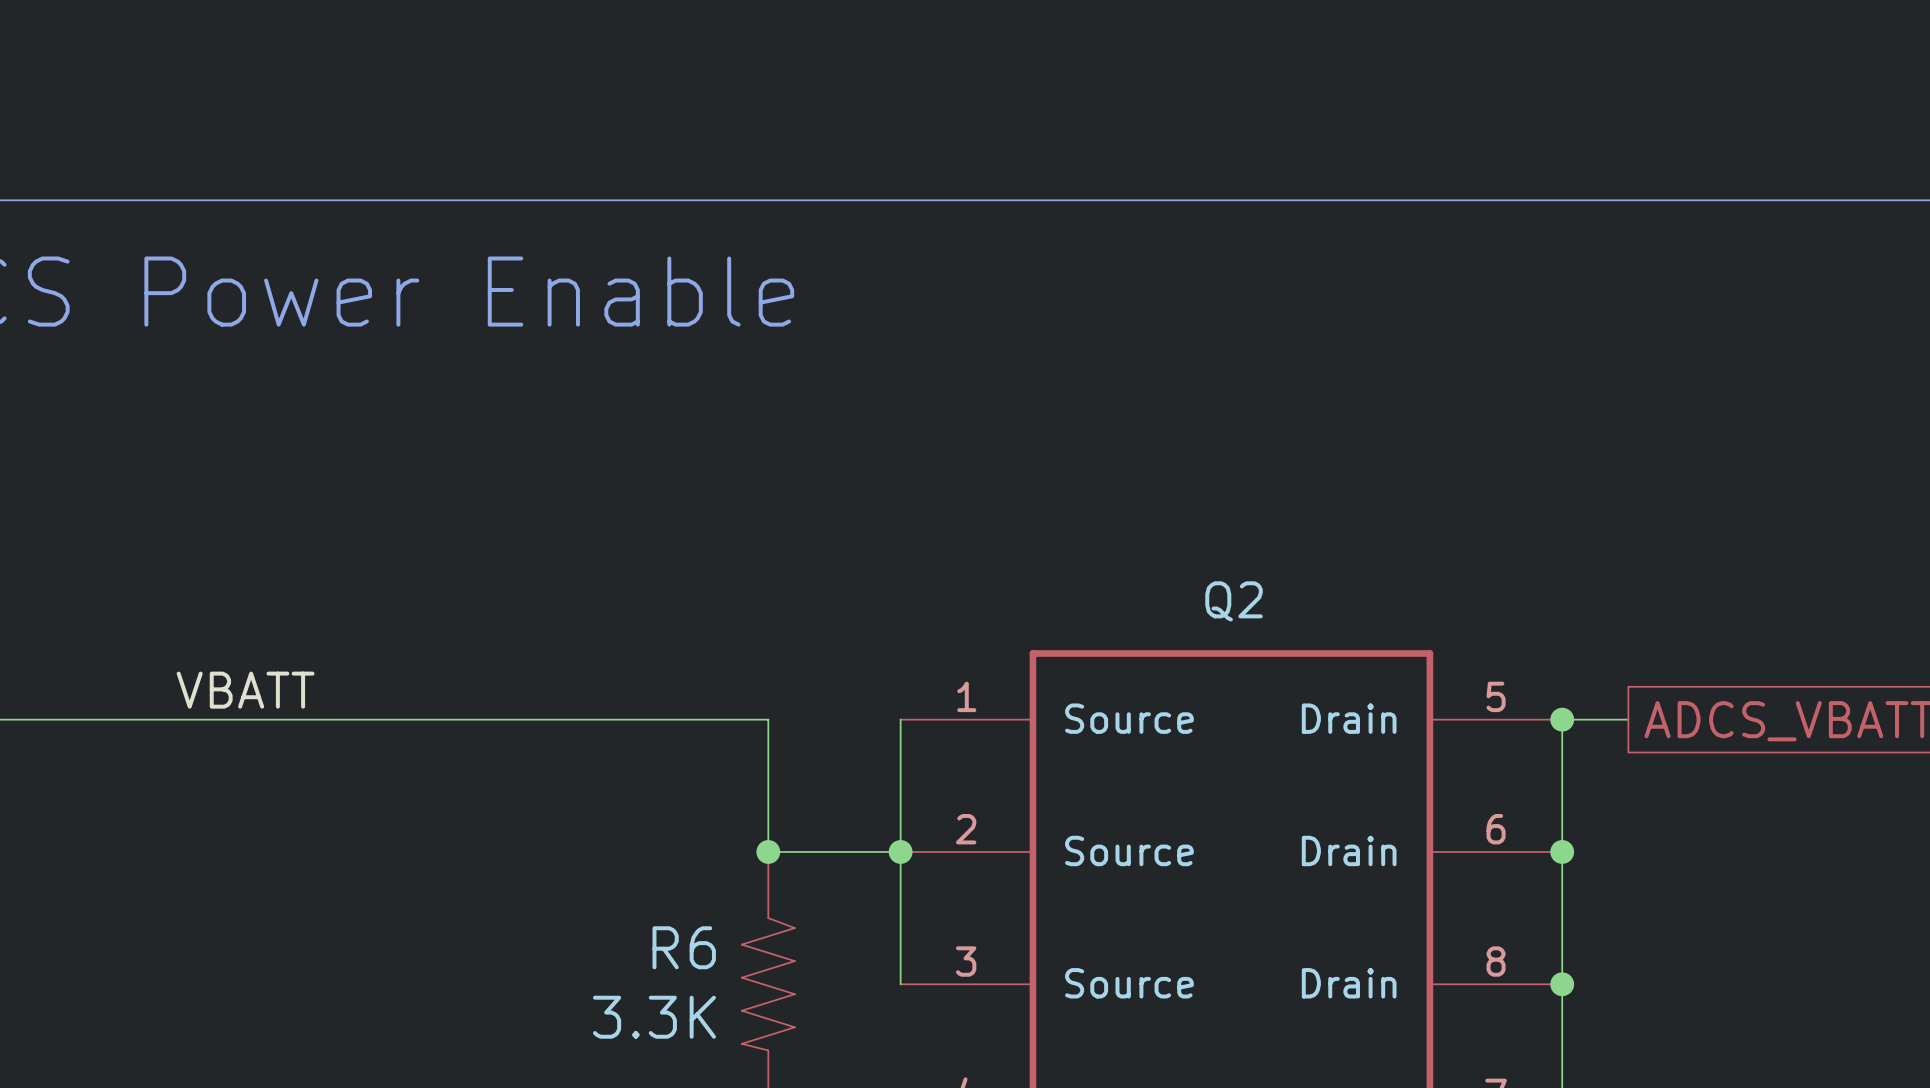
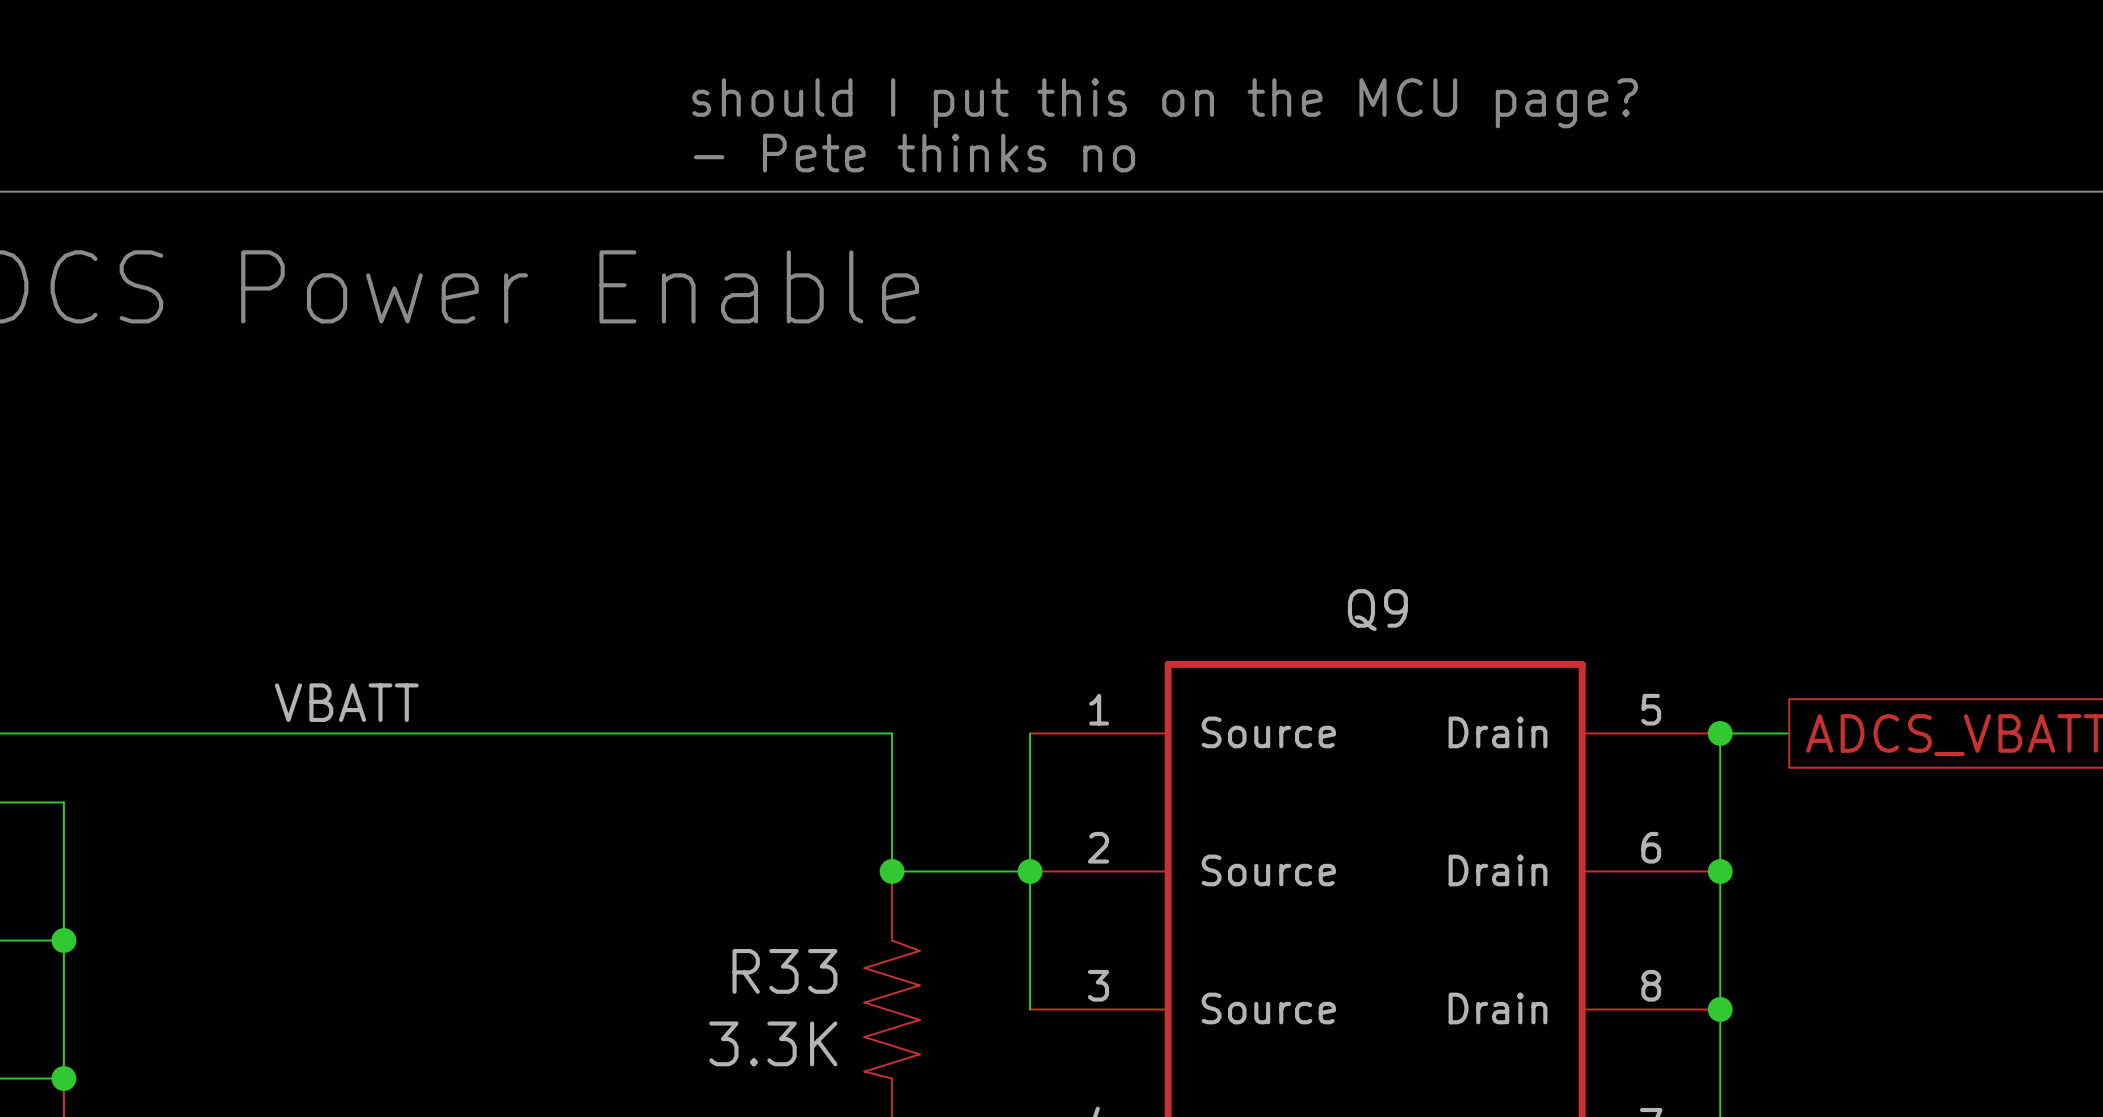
text: none -> should I put this on the MCU page? (1165, 103)
text: none -> - Pete thinks no (914, 153)
Q2 name: Q2 (1234, 601) -> Q9 (1377, 610)
R6 name: R6 (684, 947) -> R33 (784, 971)

